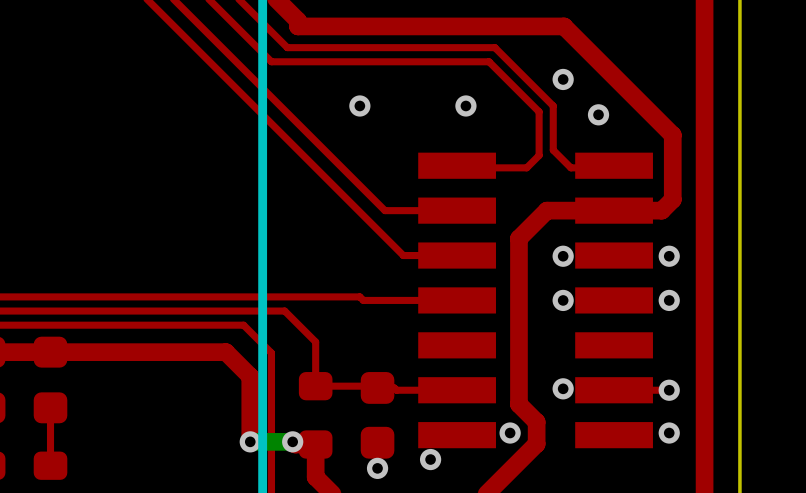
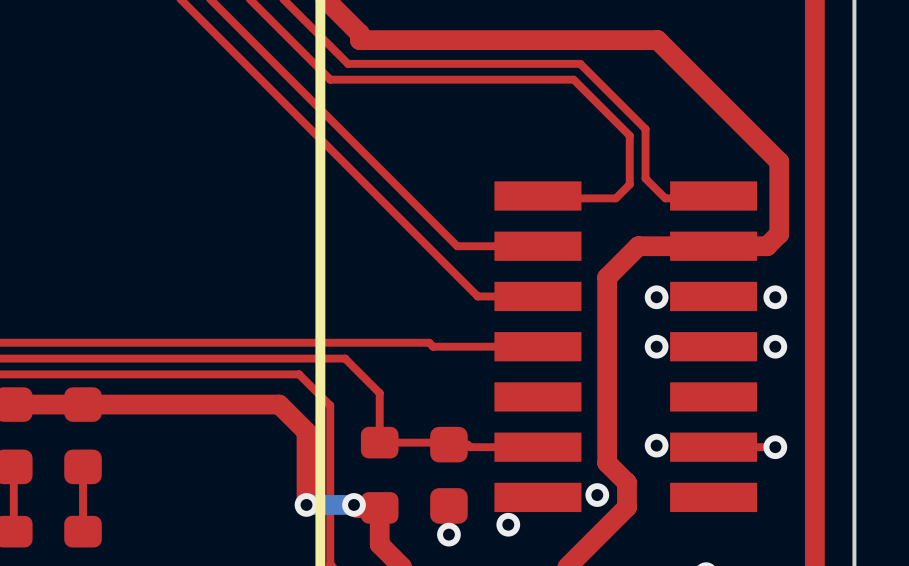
via: (563, 79) -> none
via: (359, 105) -> none
via: (465, 105) -> none
via: (598, 114) -> none
via: (669, 433) -> none

